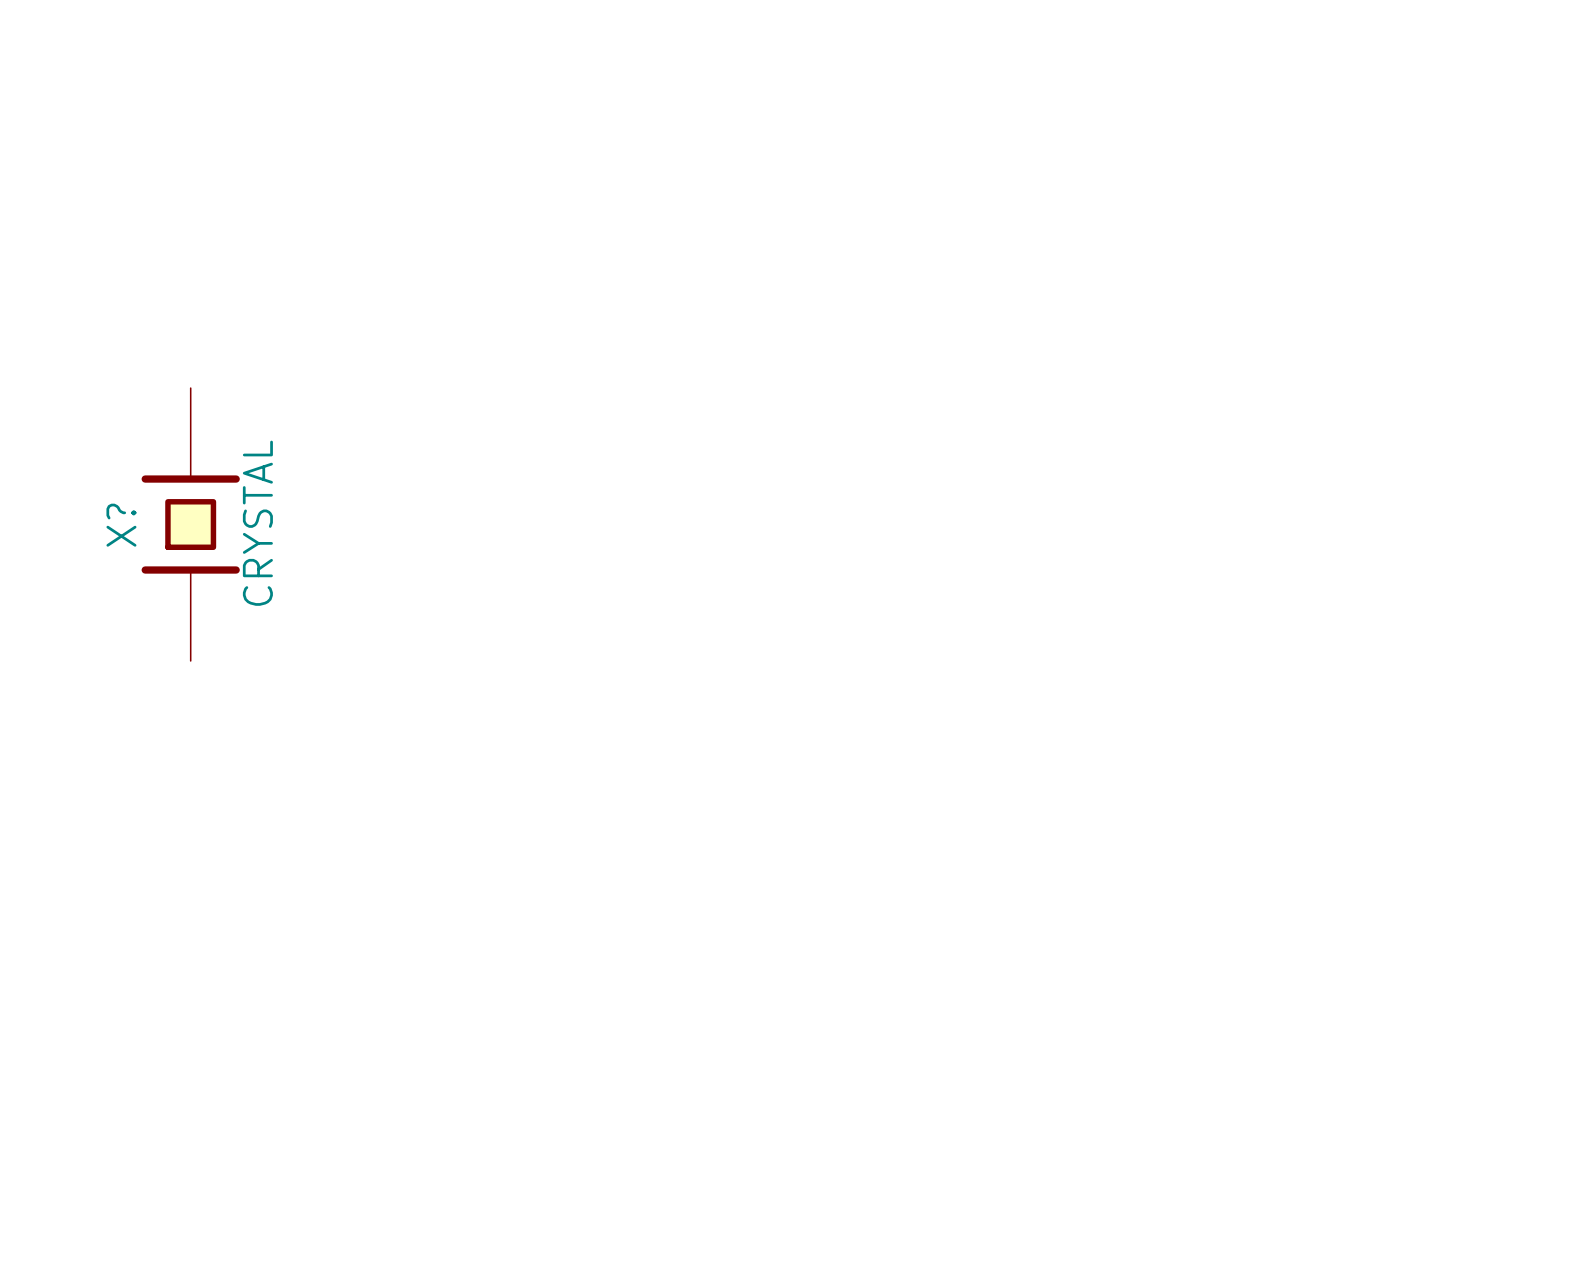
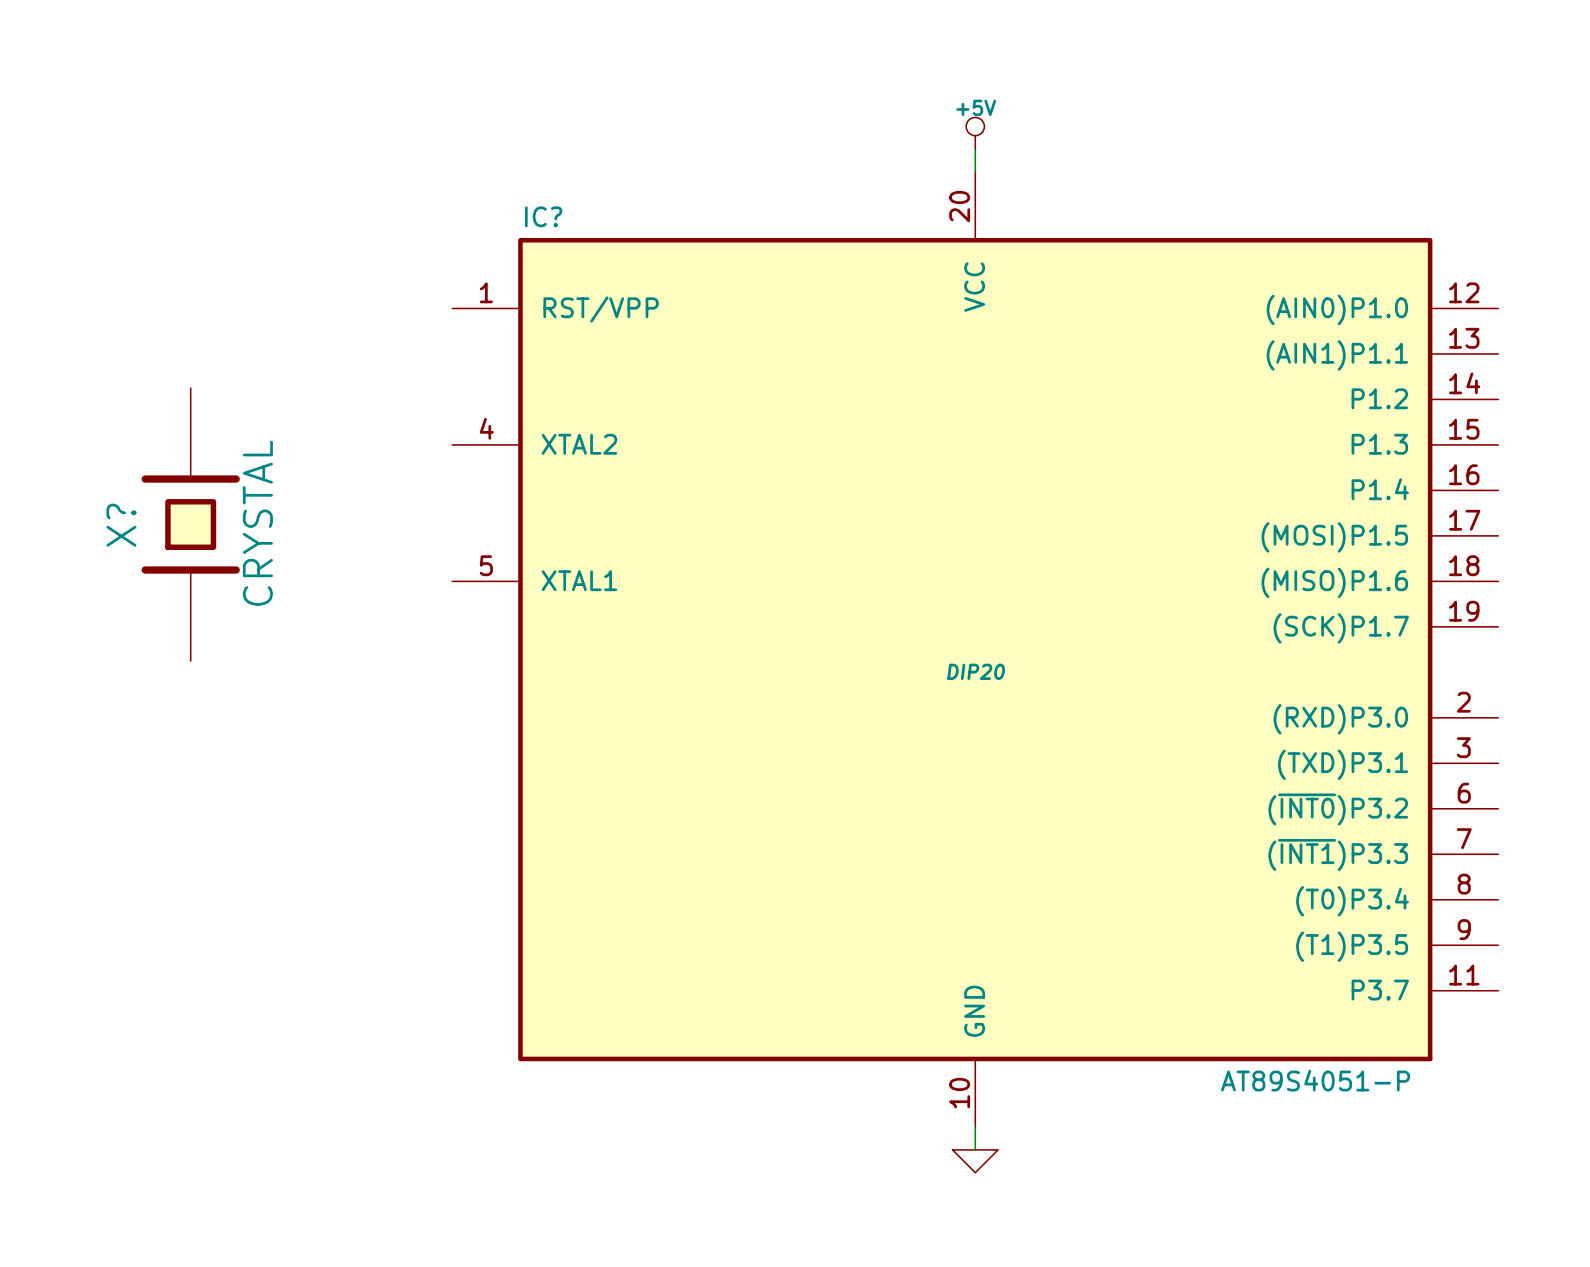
power symbol: none -> +5V (975, 133)
wire: none -> (975, 149) (975, 172)
IC?: none -> AT89S4051-P (975, 649)
wire: none -> (975, 1127) (975, 1149)
power symbol: none -> (975, 1161)

